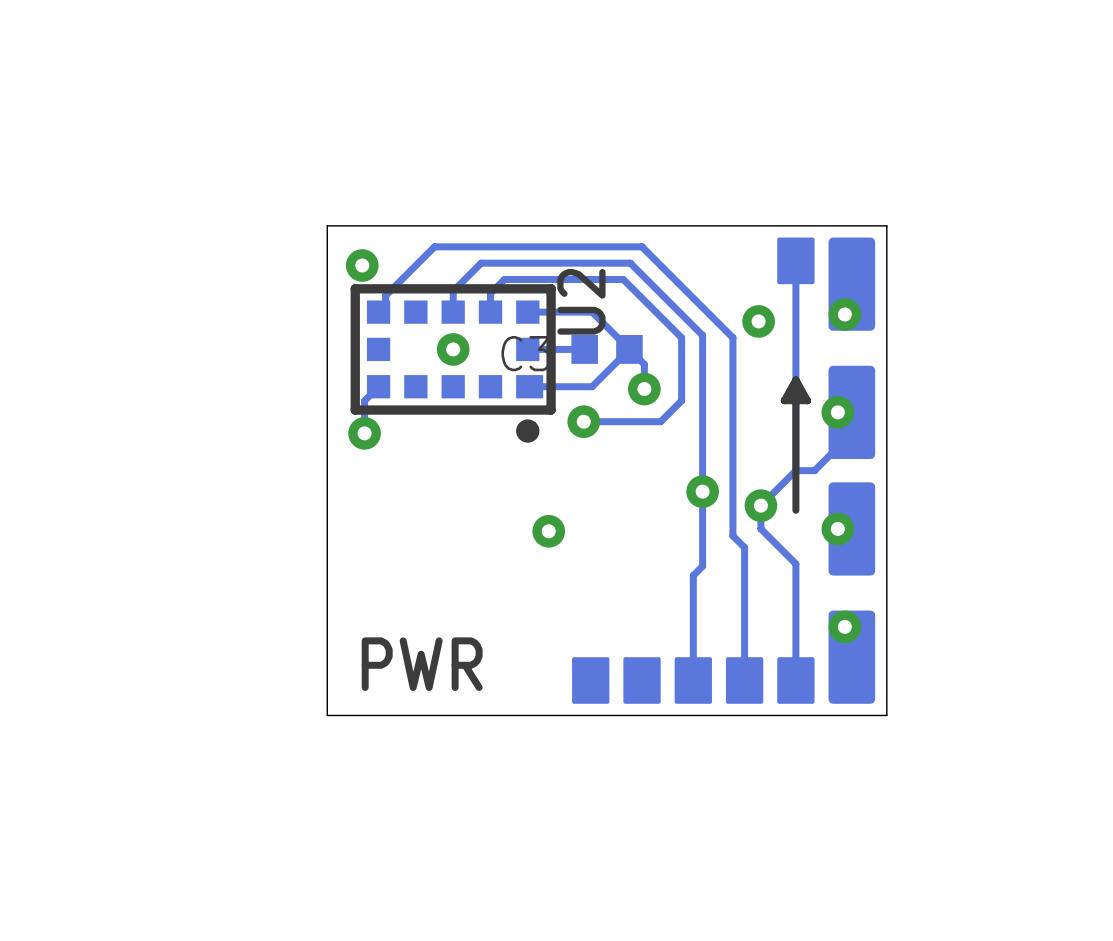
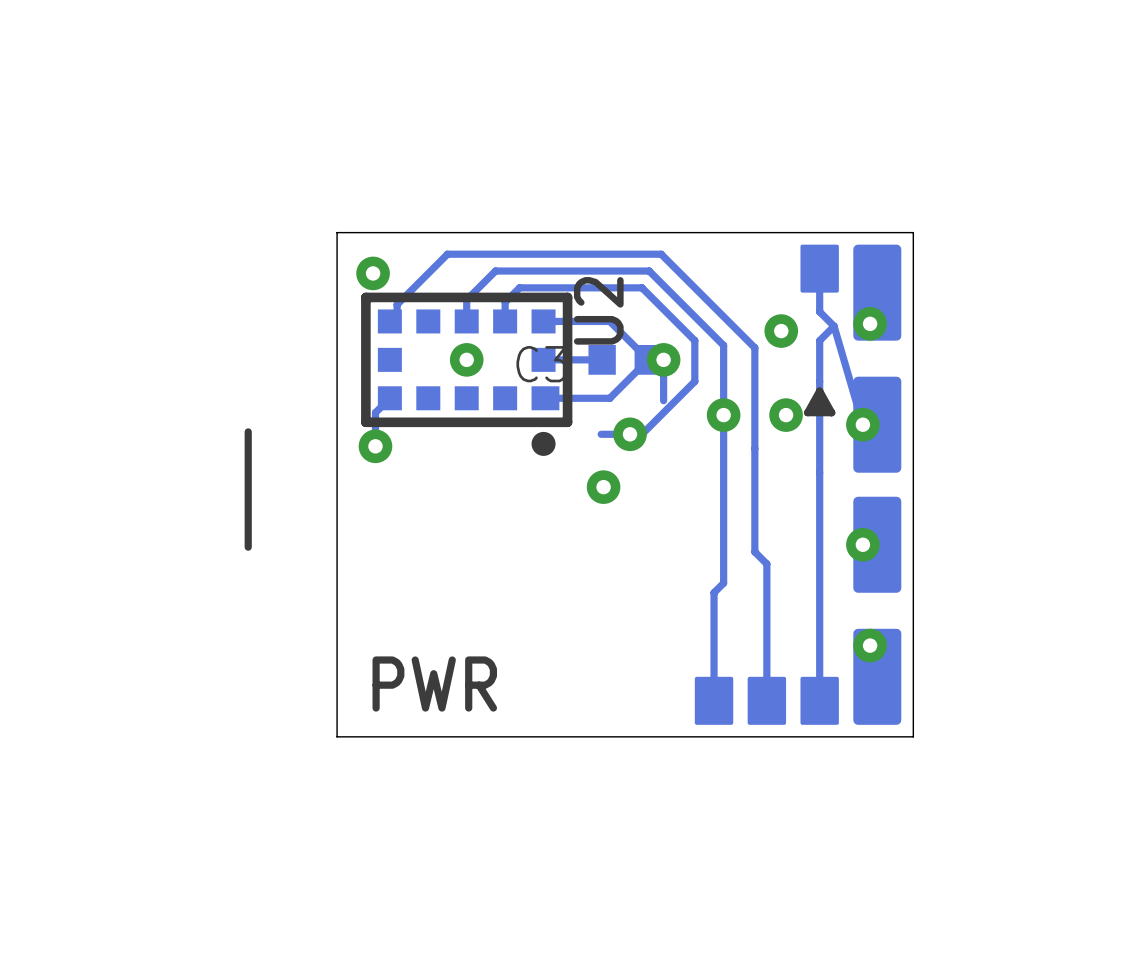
track: (795, 302) (795, 330) -> (834, 326) (819, 340)
track: none -> (819, 311) (834, 326)
track: none -> (834, 326) (862, 424)
track: (674, 330) (681, 337) (681, 400) (660, 421) (623, 421) -> (694, 340) (694, 381) (642, 434)
via: none -> (663, 359)
via: (644, 389) -> none
line: (795, 398) (795, 510) -> (248, 431) (248, 547)
via: none -> (723, 415)
via: none -> (786, 415)
track: (837, 412) (833, 417) (833, 452) (814, 470) (795, 470) (760, 505) (760, 528) (795, 563) -> (819, 484) (819, 580)
via position: (583, 421) -> (629, 434)
via: none -> (603, 487)
via: (702, 491) -> none
via: (760, 505) -> none
via: (548, 531) -> none
part: (590, 680) -> none
part: (642, 680) -> none

